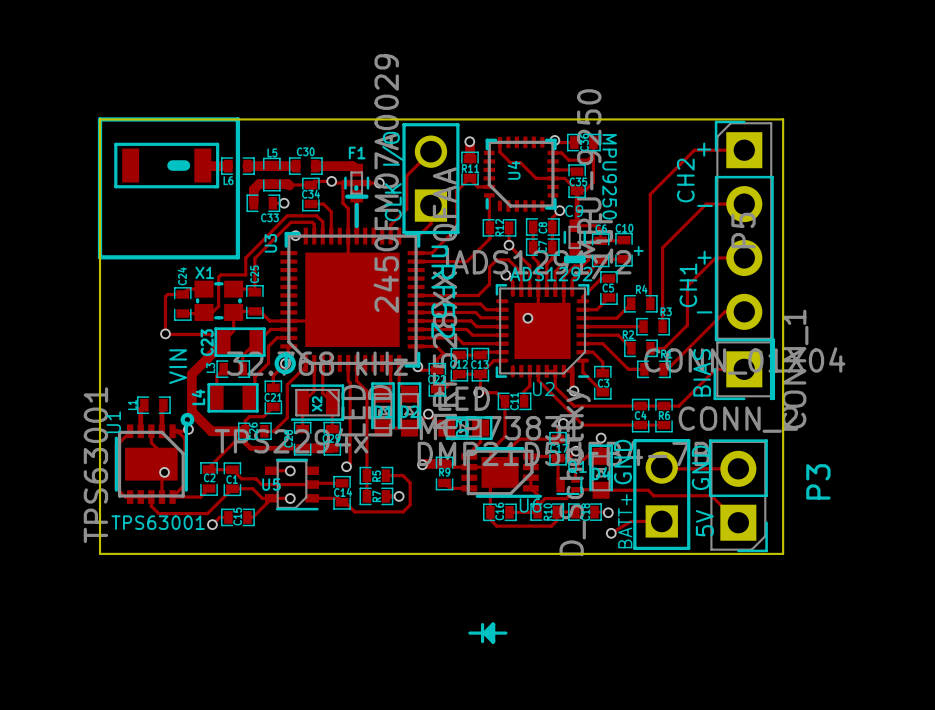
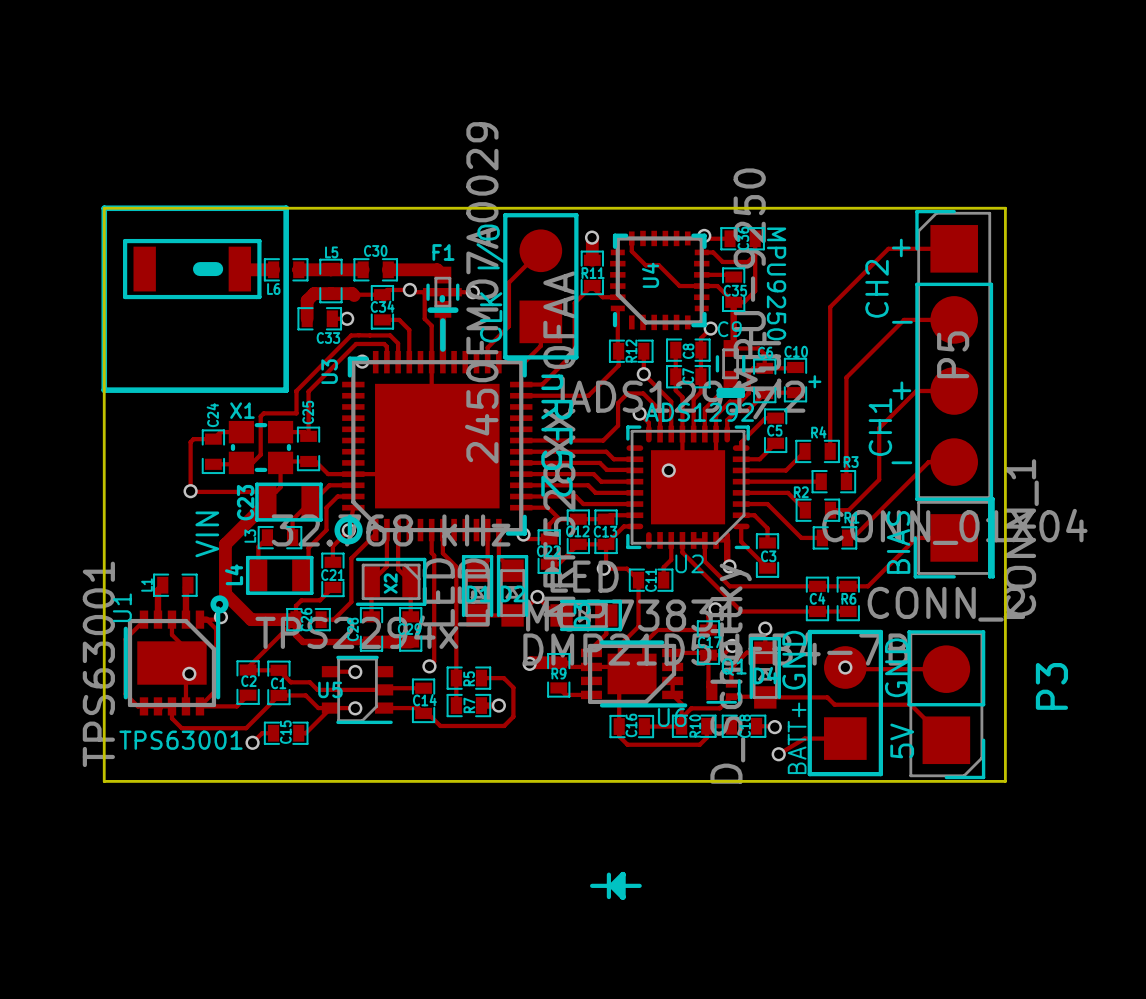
P5 footprint: [714, 120, 774, 342] -> [915, 209, 994, 501]
part footprint: [402, 123, 460, 235] -> [503, 213, 579, 360]
part footprint: [713, 338, 776, 401] -> [913, 497, 995, 579]
part footprint: [633, 439, 691, 551] -> [807, 629, 884, 777]
P3 footprint: [708, 439, 768, 553] -> [907, 630, 986, 780]
via: none -> (845, 667)

